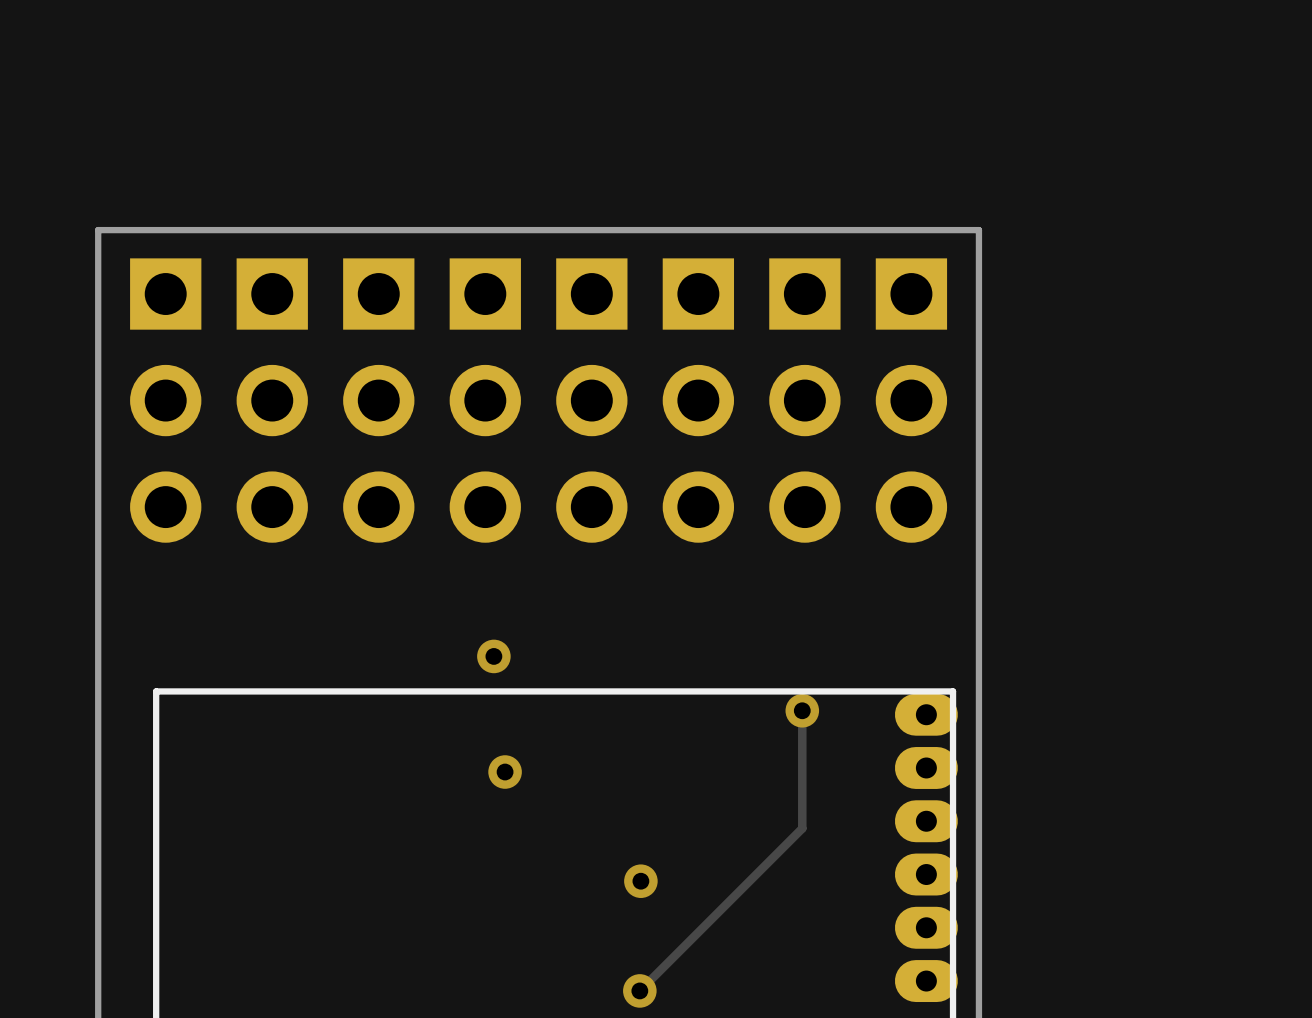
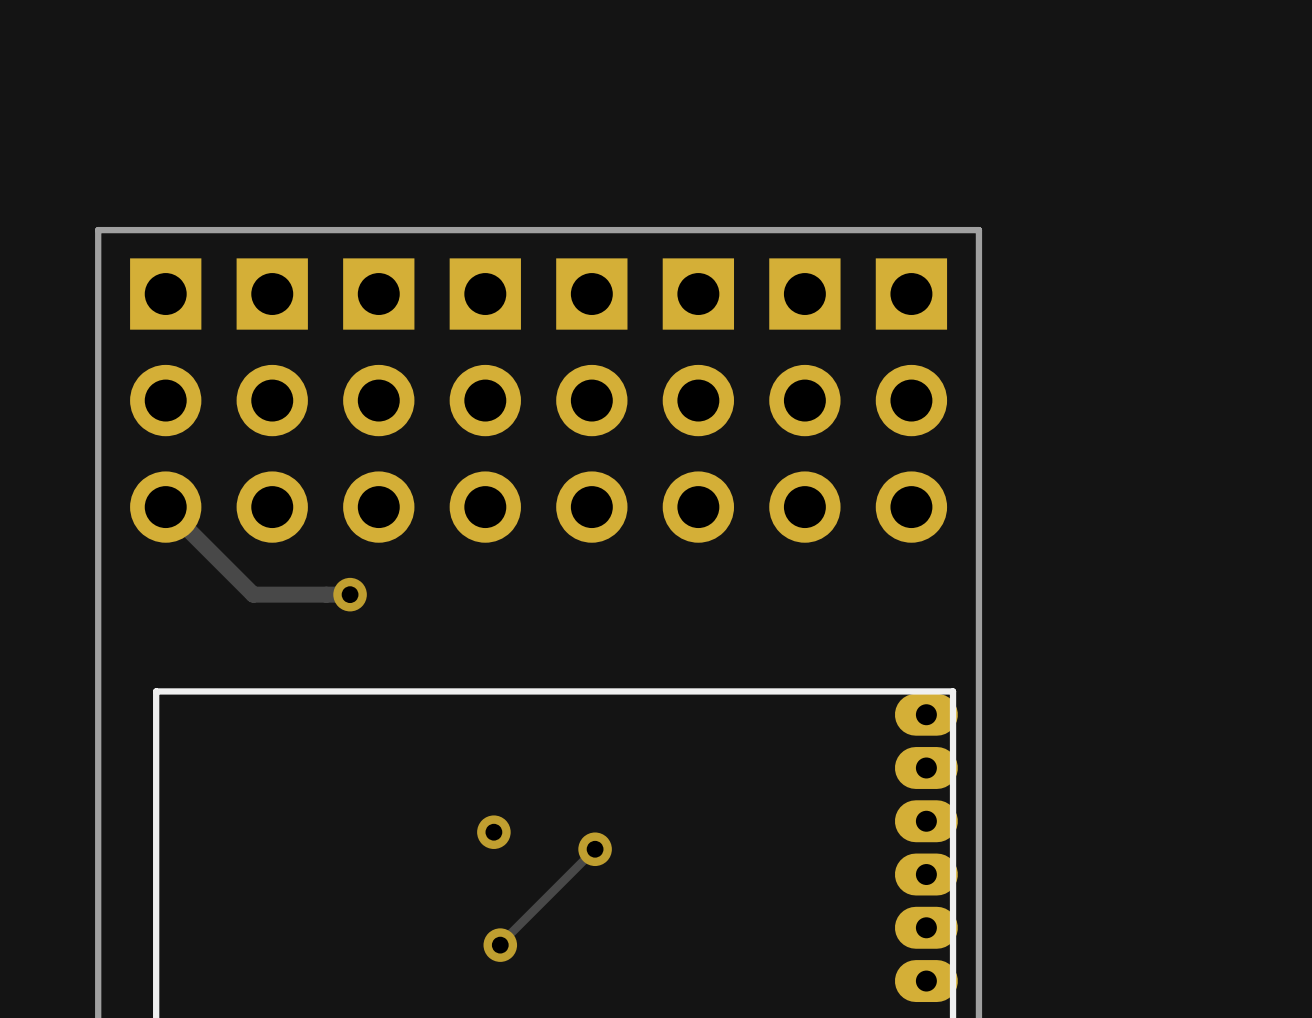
track: none -> (165, 507) (253, 594) (350, 594)
via: none -> (350, 594)
via: (493, 656) -> none
track: (802, 710) (802, 828) (639, 990) -> none
via: (802, 710) -> none
via: (505, 772) -> none
via: none -> (493, 832)
track: none -> (595, 849) (500, 945)
via position: (640, 881) -> (595, 849)
via: none -> (500, 945)
via: (639, 990) -> none

